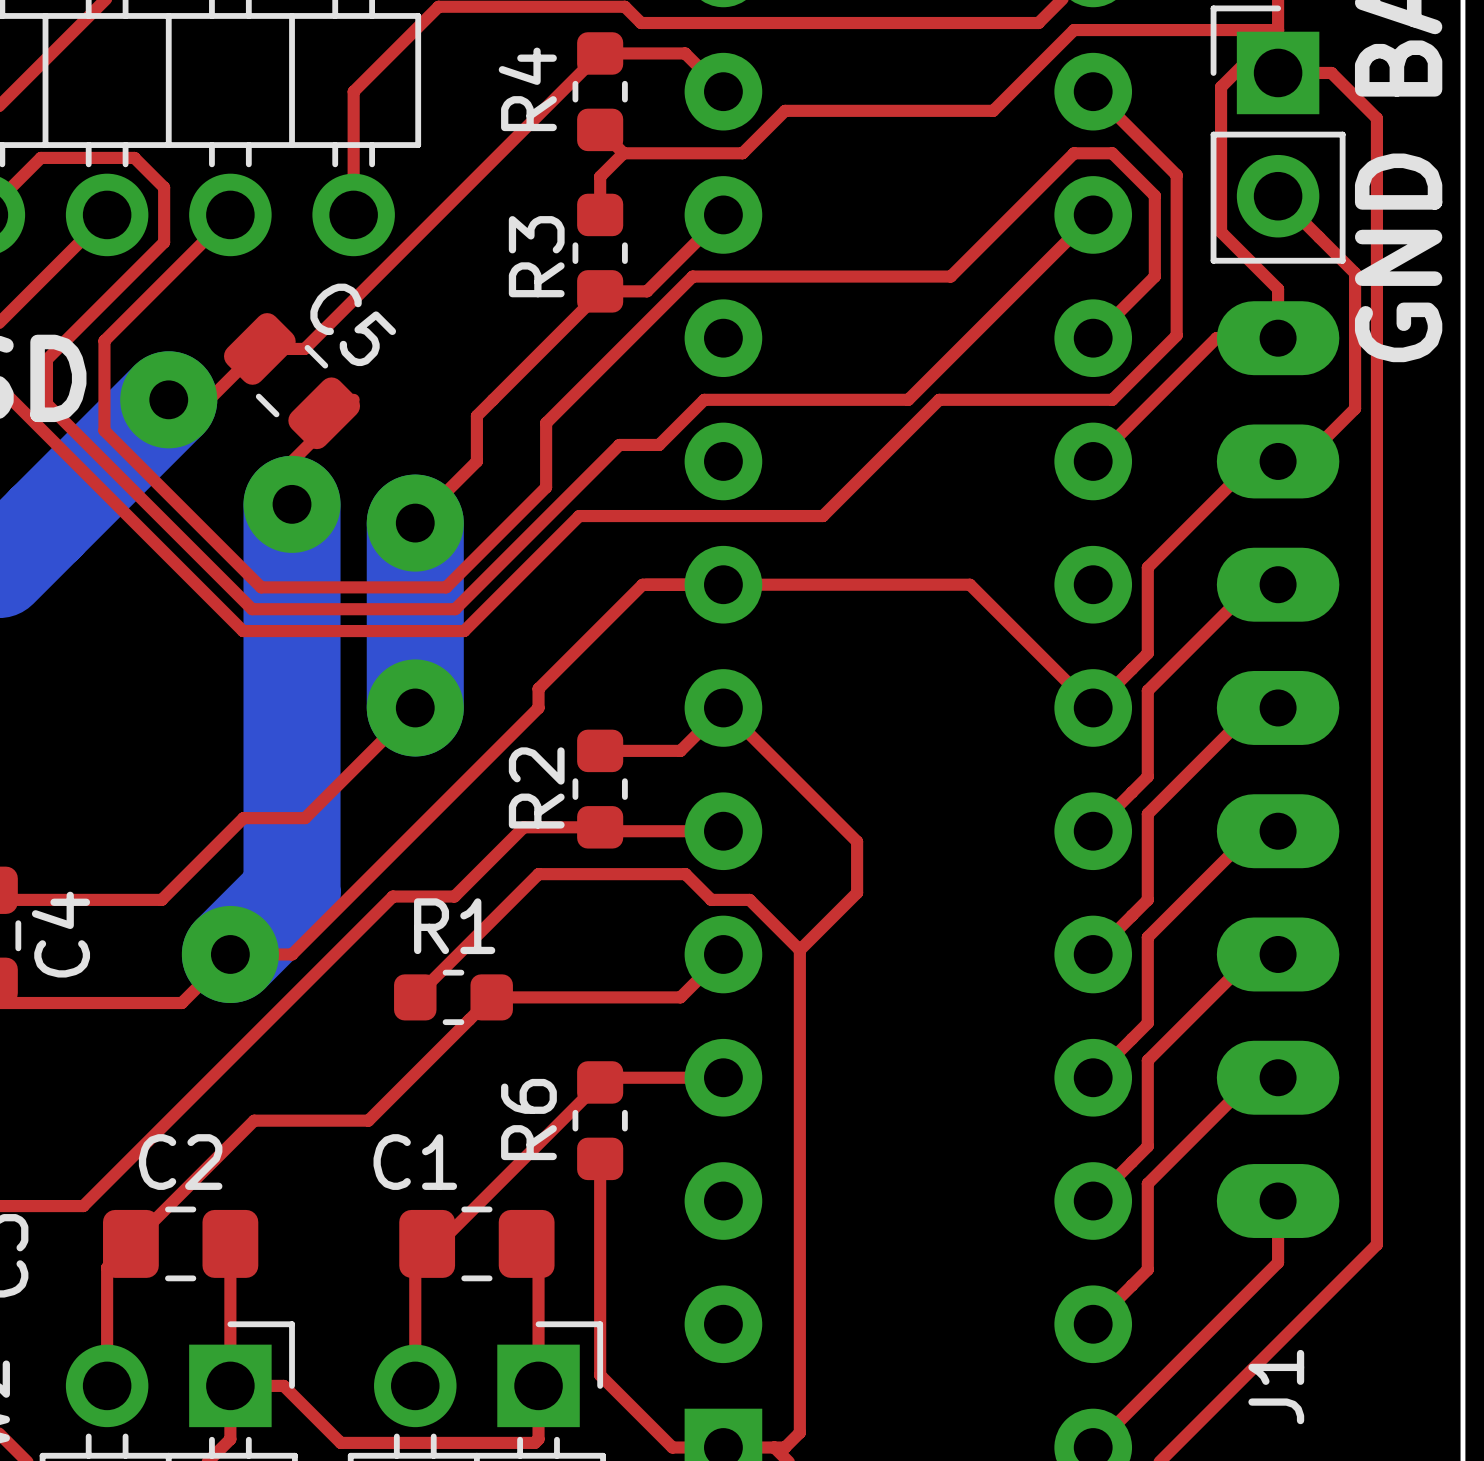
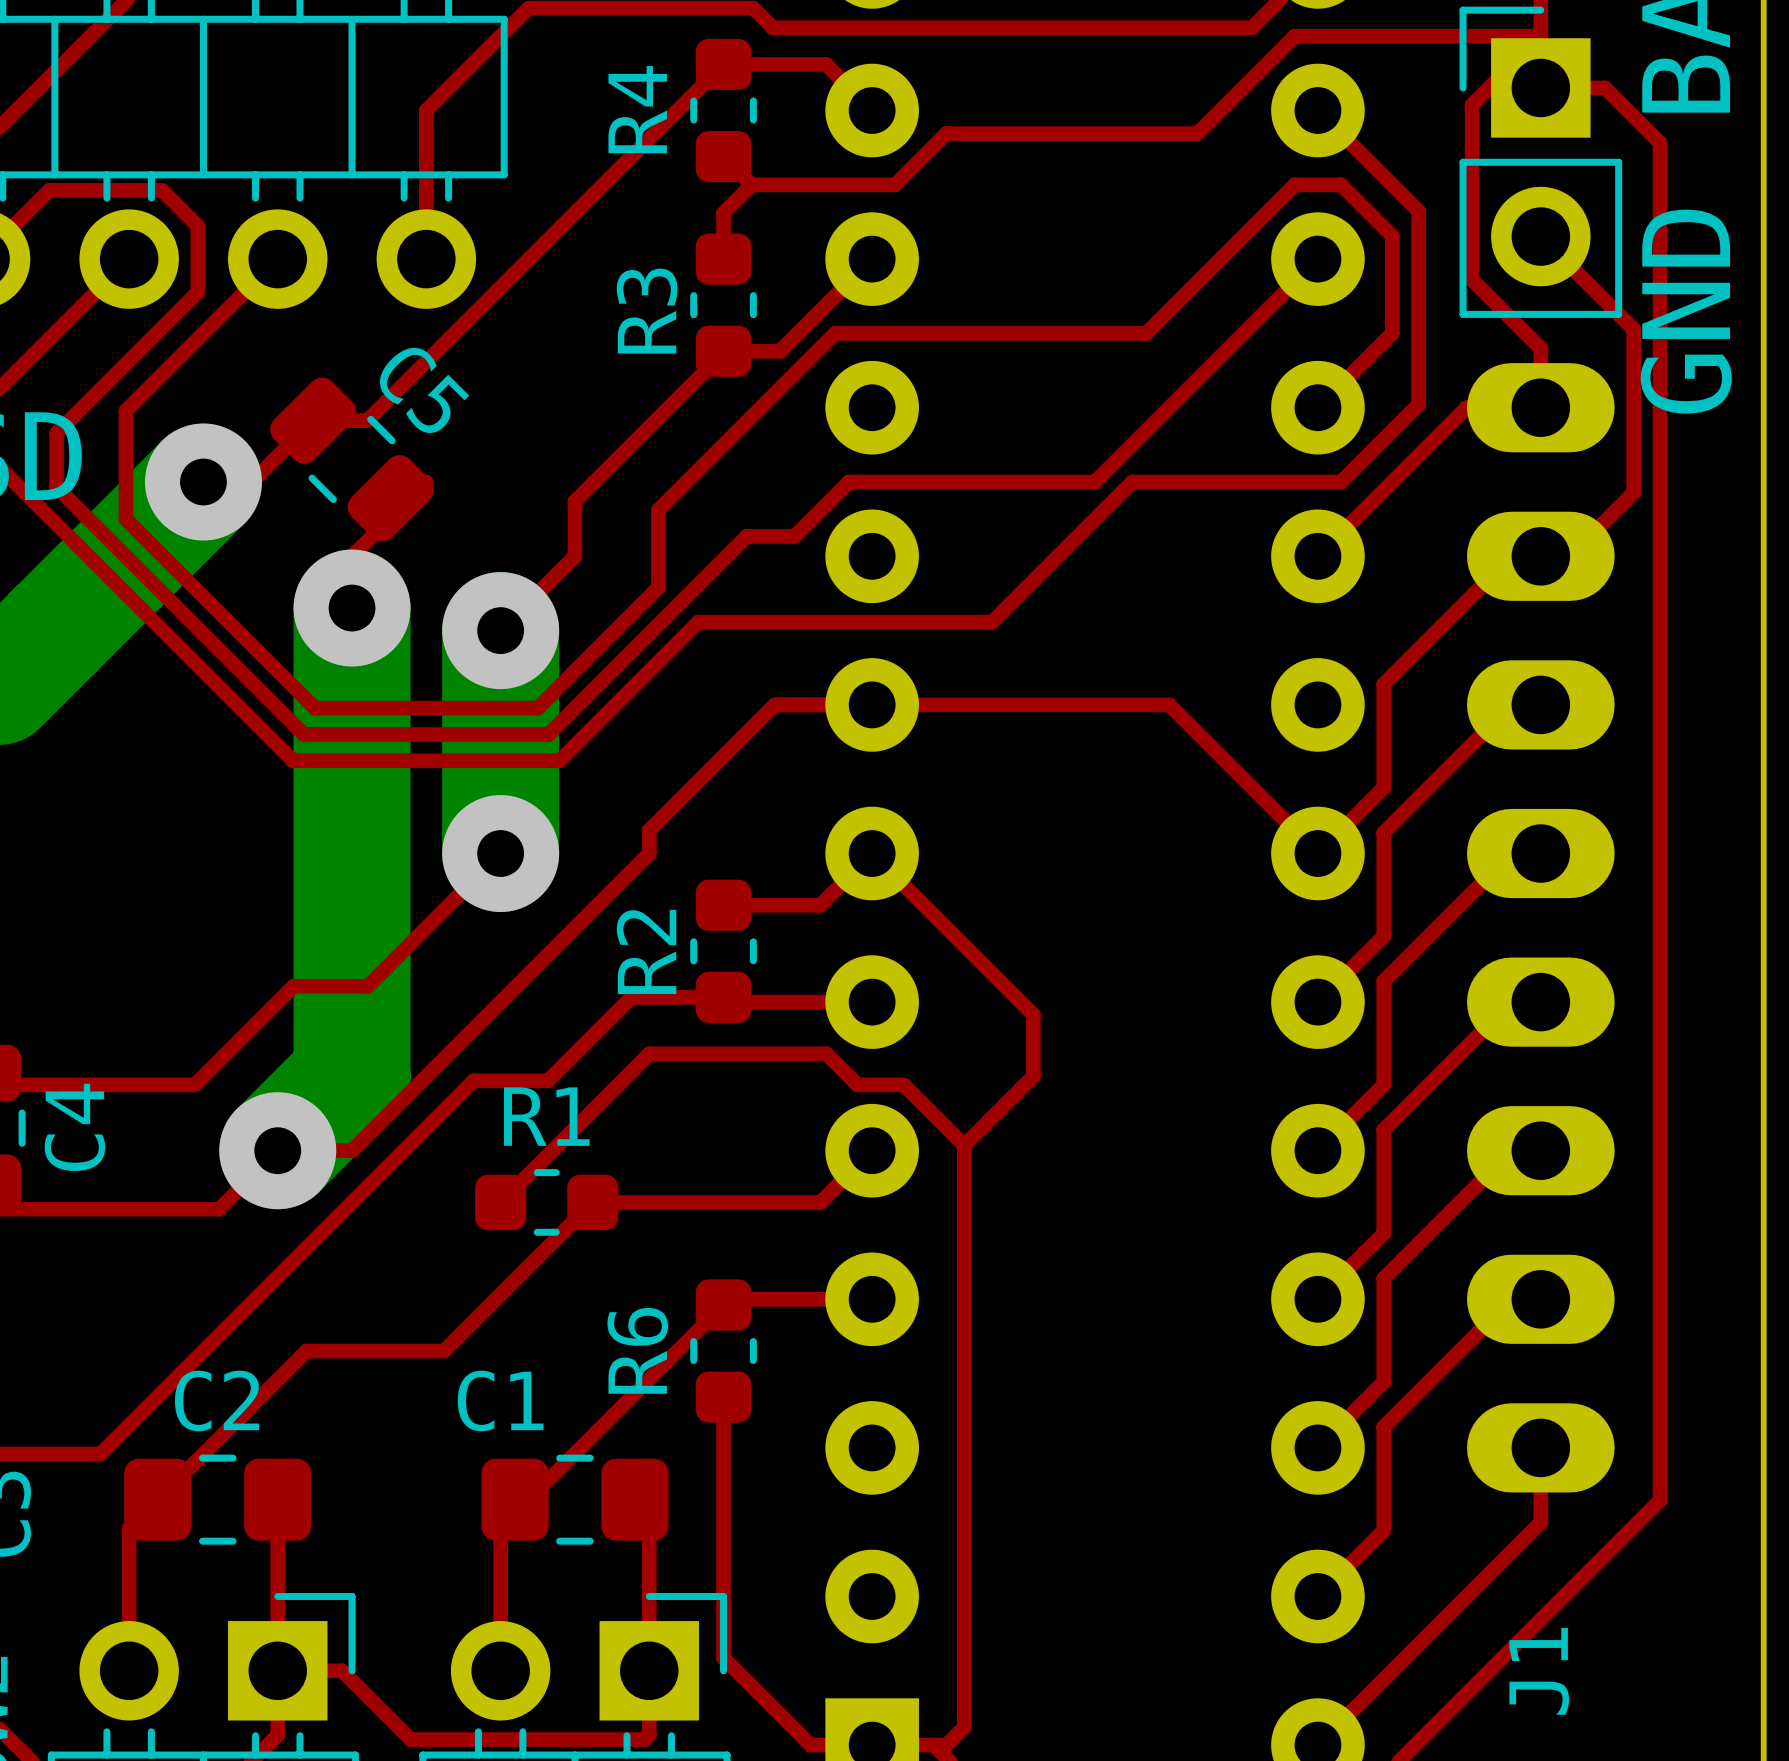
J1 footprint: [1216, 301, 1340, 1238] -> [1467, 363, 1615, 1493]

